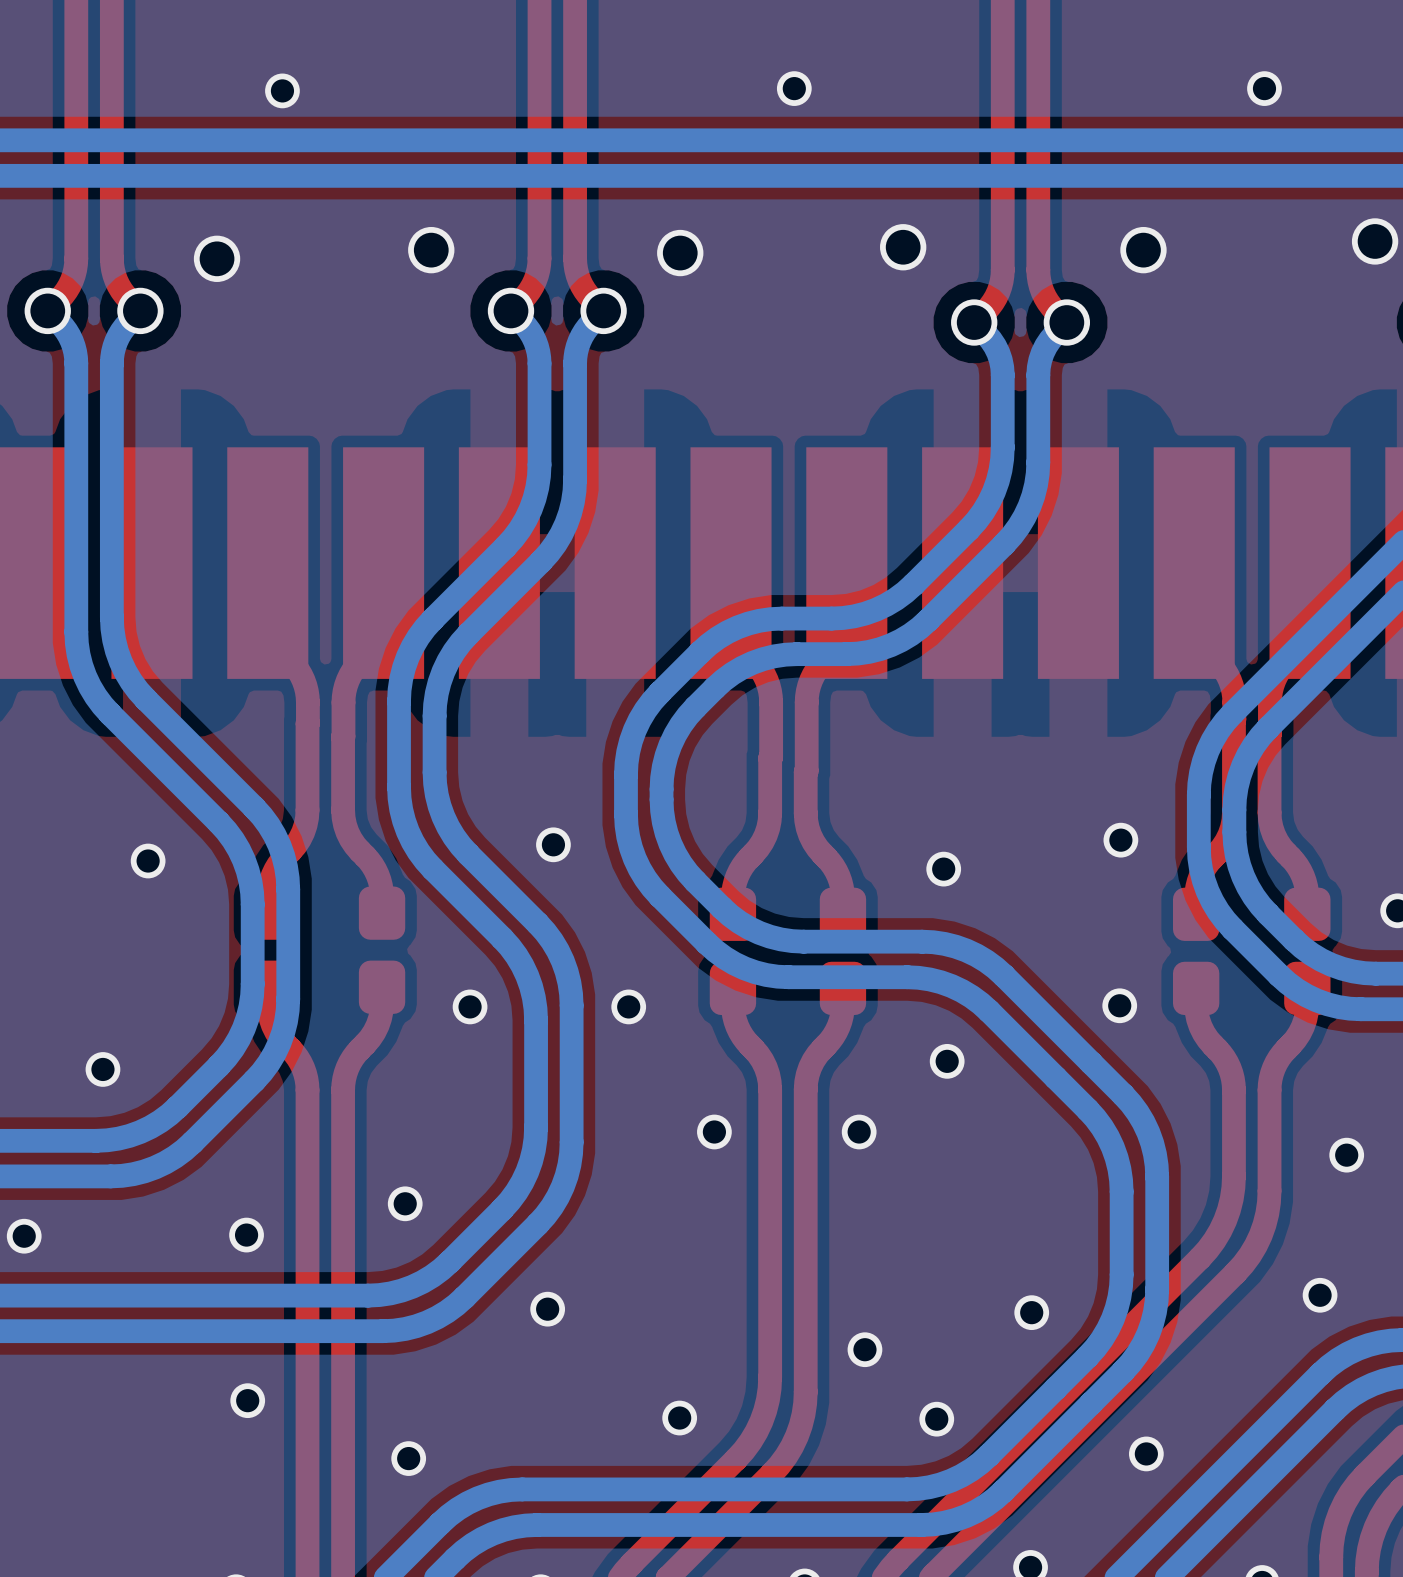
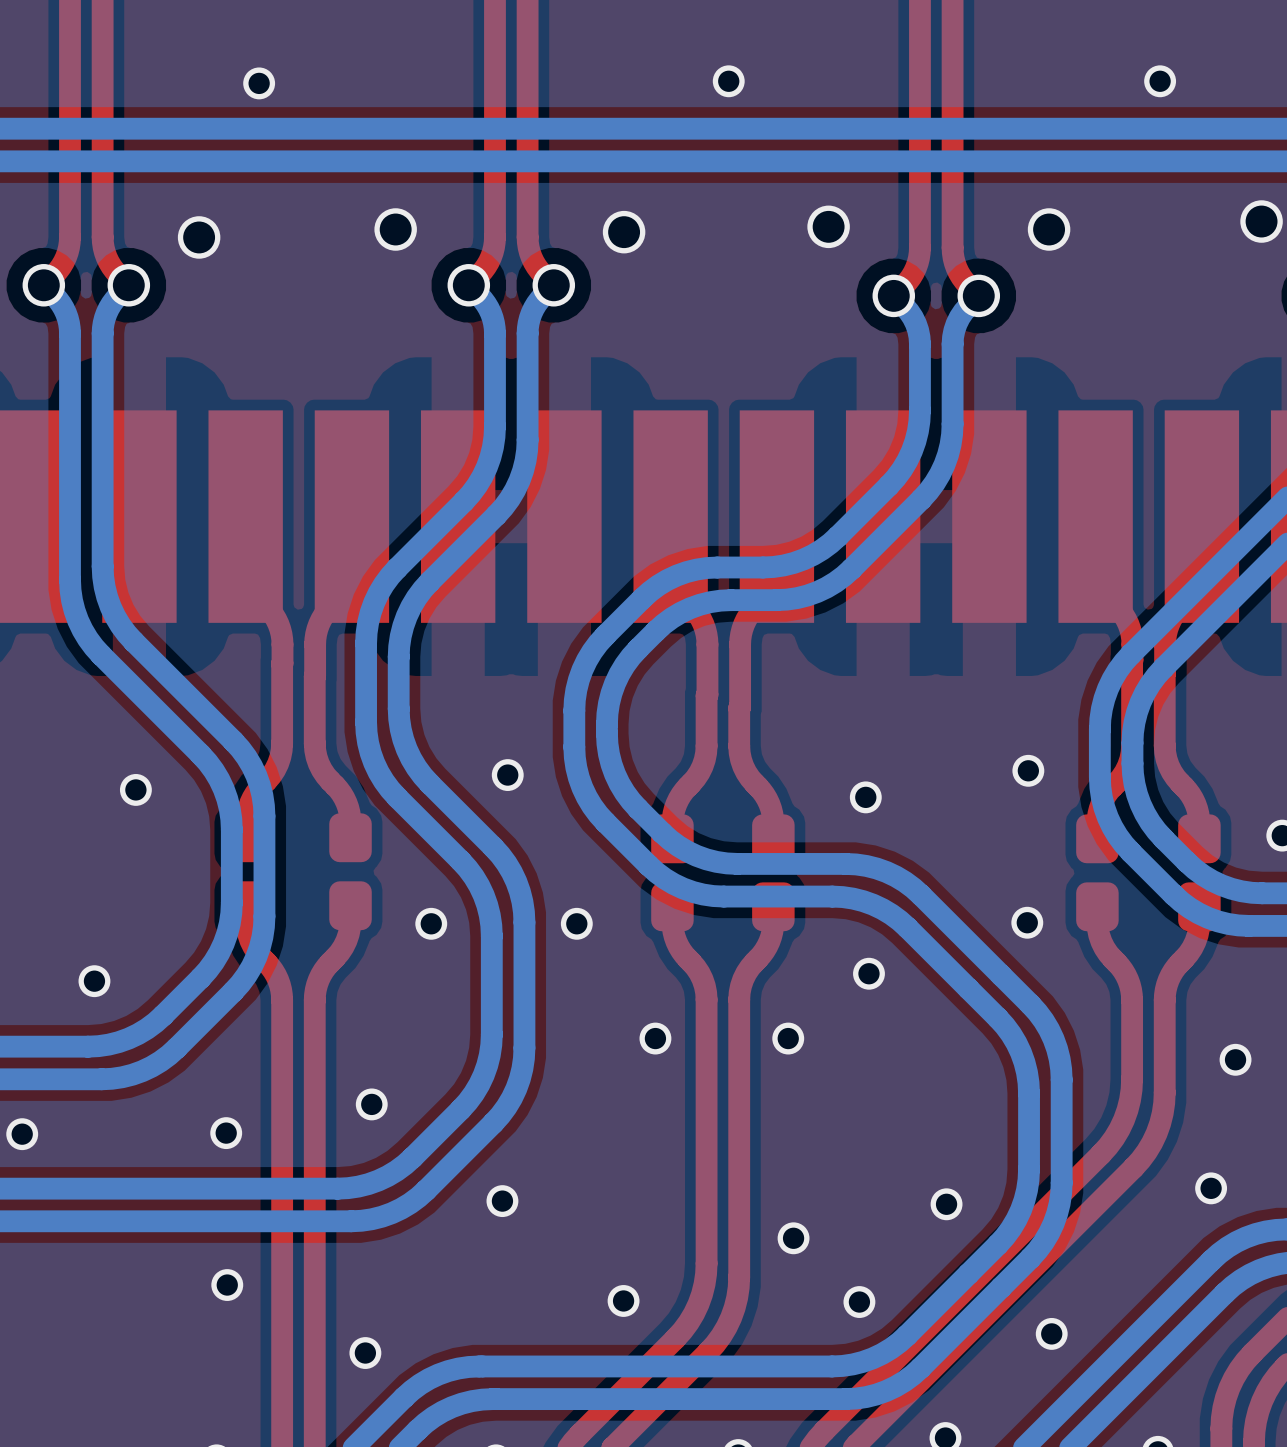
via position: (408, 1458) -> (365, 1353)

